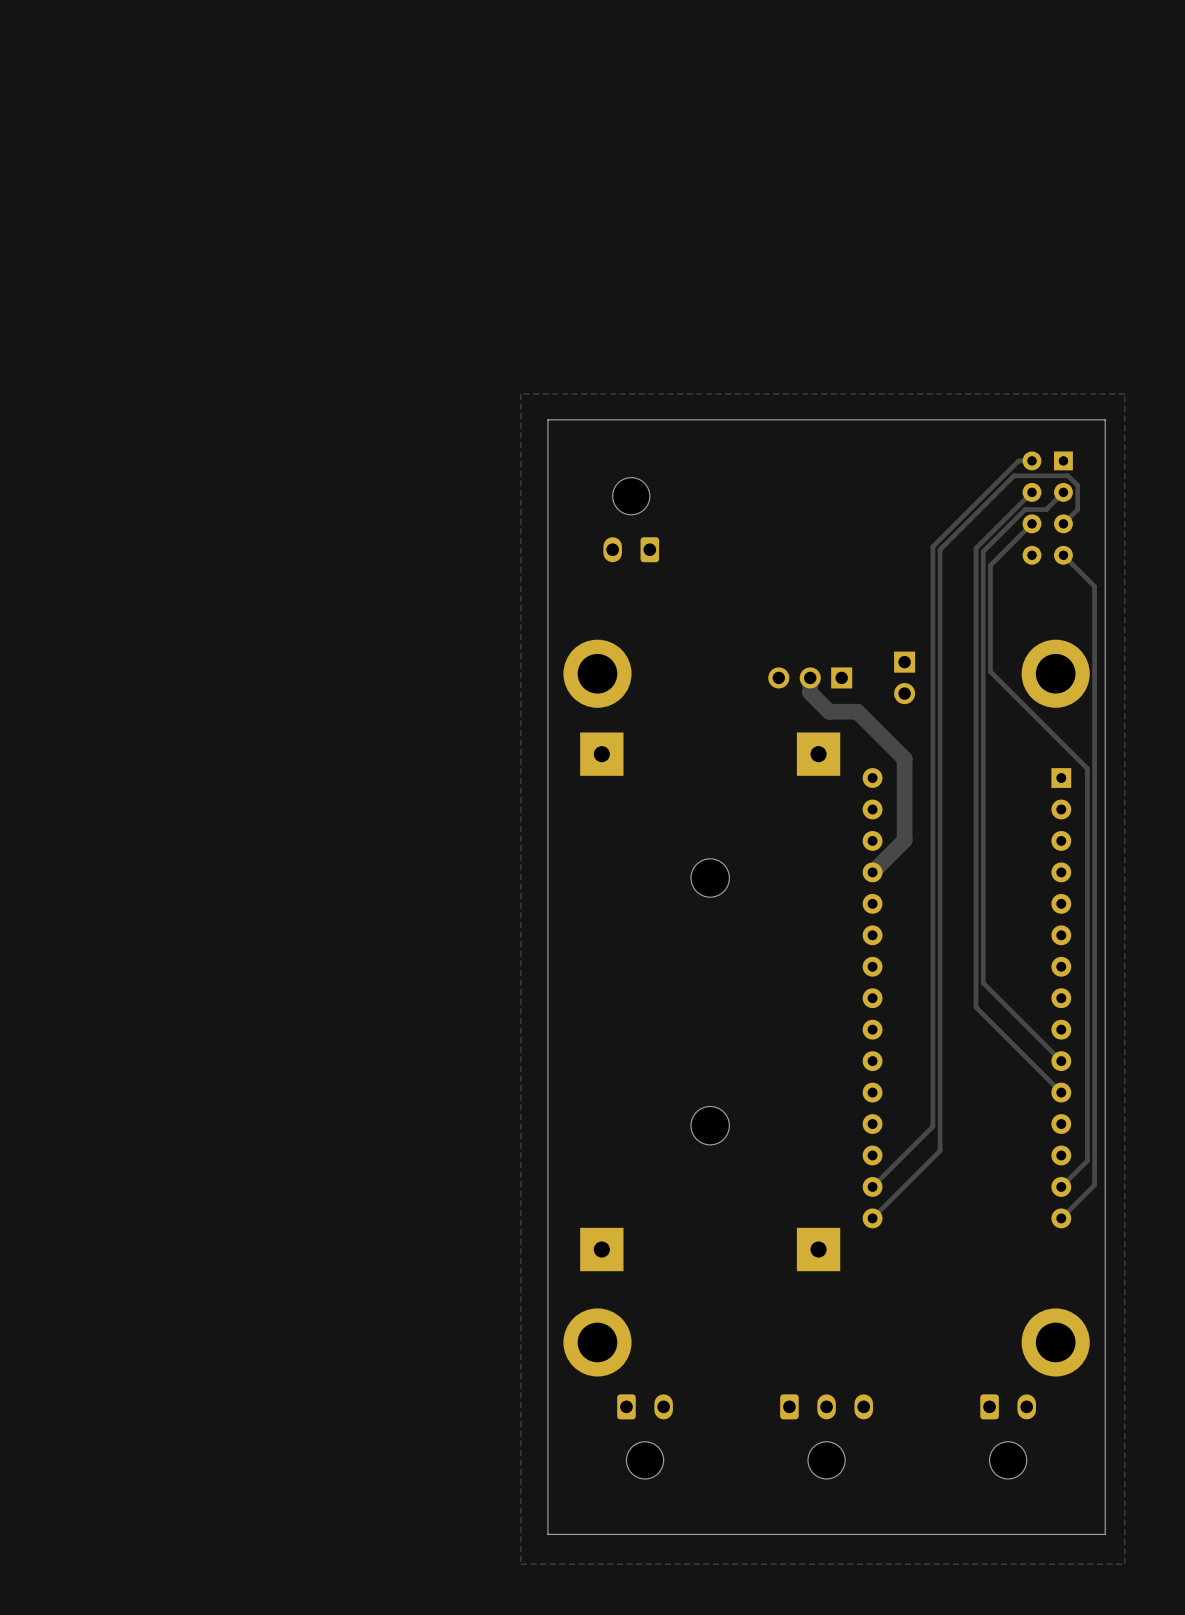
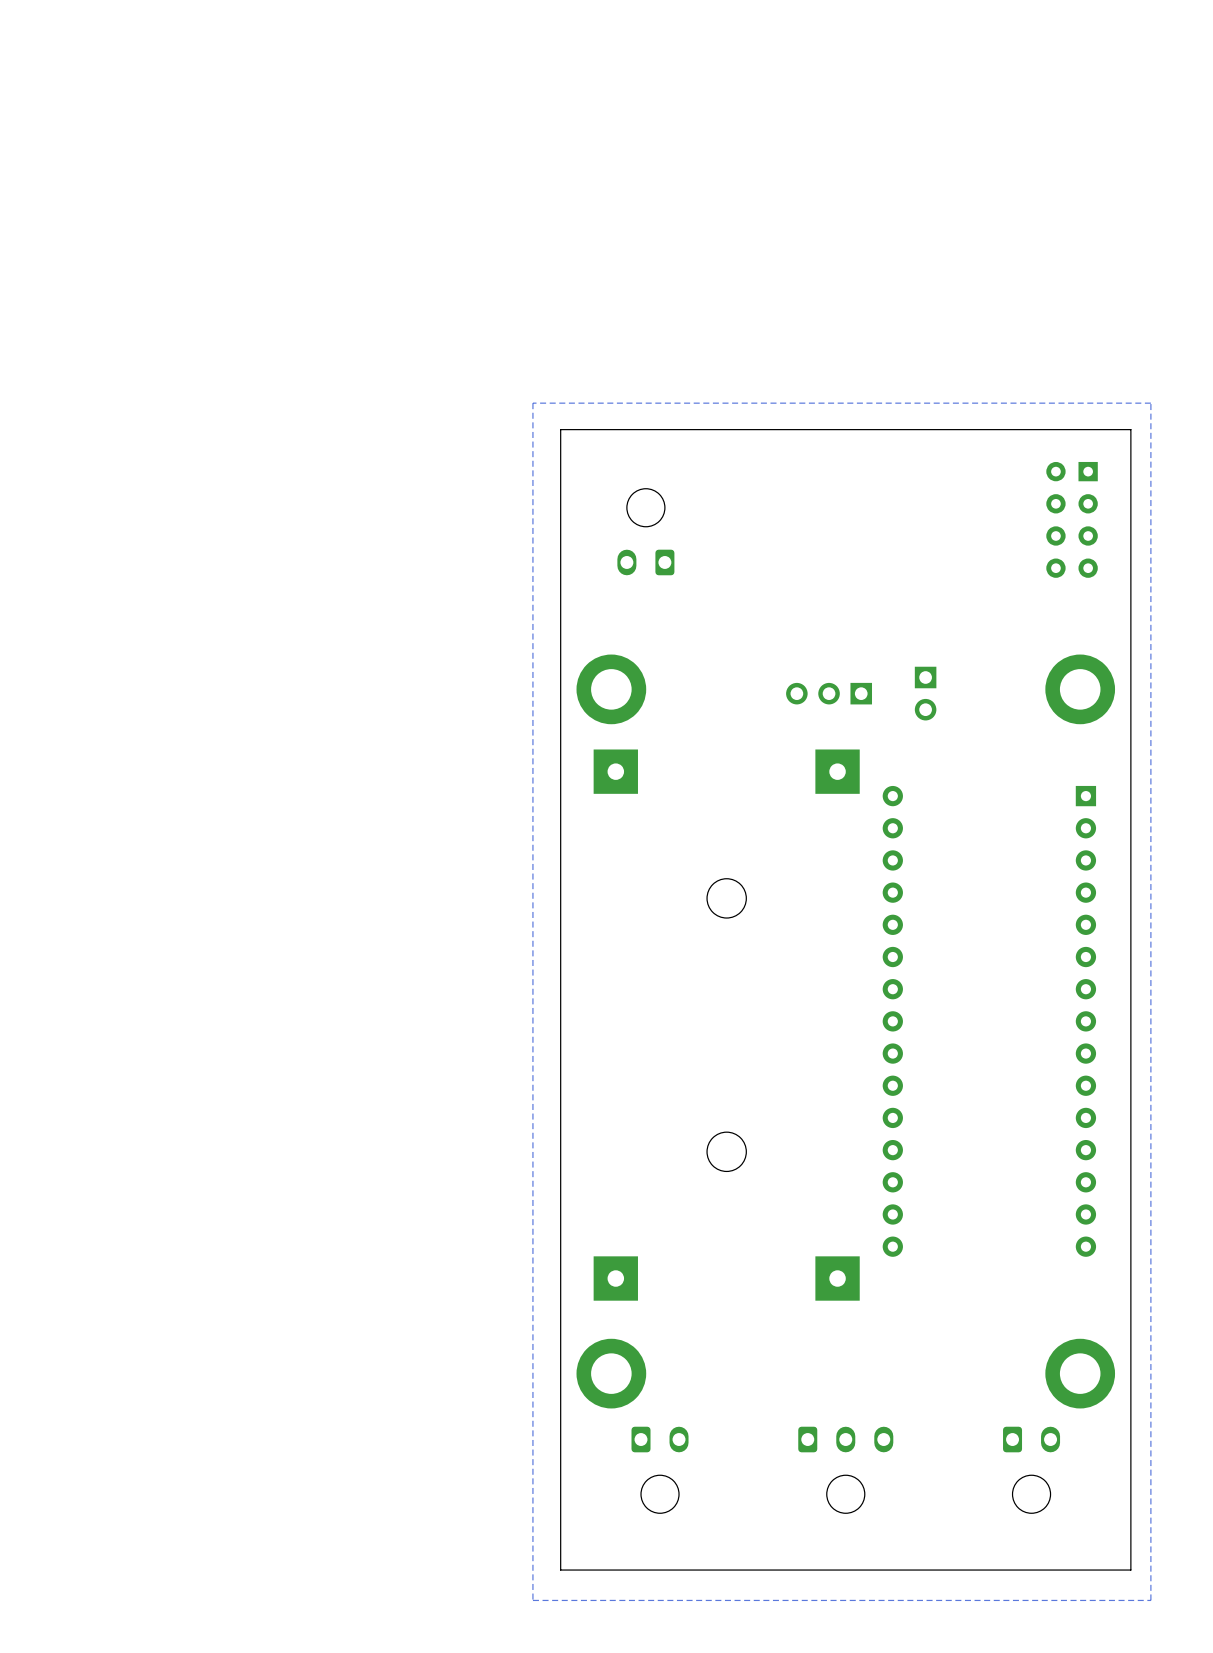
track: (1032, 460) (1018, 460) (932, 546) (932, 1126) (872, 1186) -> none
track: (1032, 492) (976, 548) (976, 1007) (1061, 1092) -> none
track: (1063, 492) (1046, 509) (1025, 509) (983, 551) (983, 983) (1061, 1061) -> none
track: (1032, 523) (990, 565) (990, 671) (1087, 768) (1087, 1160) (1061, 1186) -> none
track: (1063, 523) (1077, 509) (1077, 485) (1067, 475) (1013, 475) (940, 549) (940, 1150) (872, 1218) -> none
track: (1063, 555) (1094, 586) (1094, 1185) (1061, 1218) -> none
track: (810, 677) (810, 692) (829, 711) (857, 711) (904, 758) (904, 840) (872, 872) -> none

